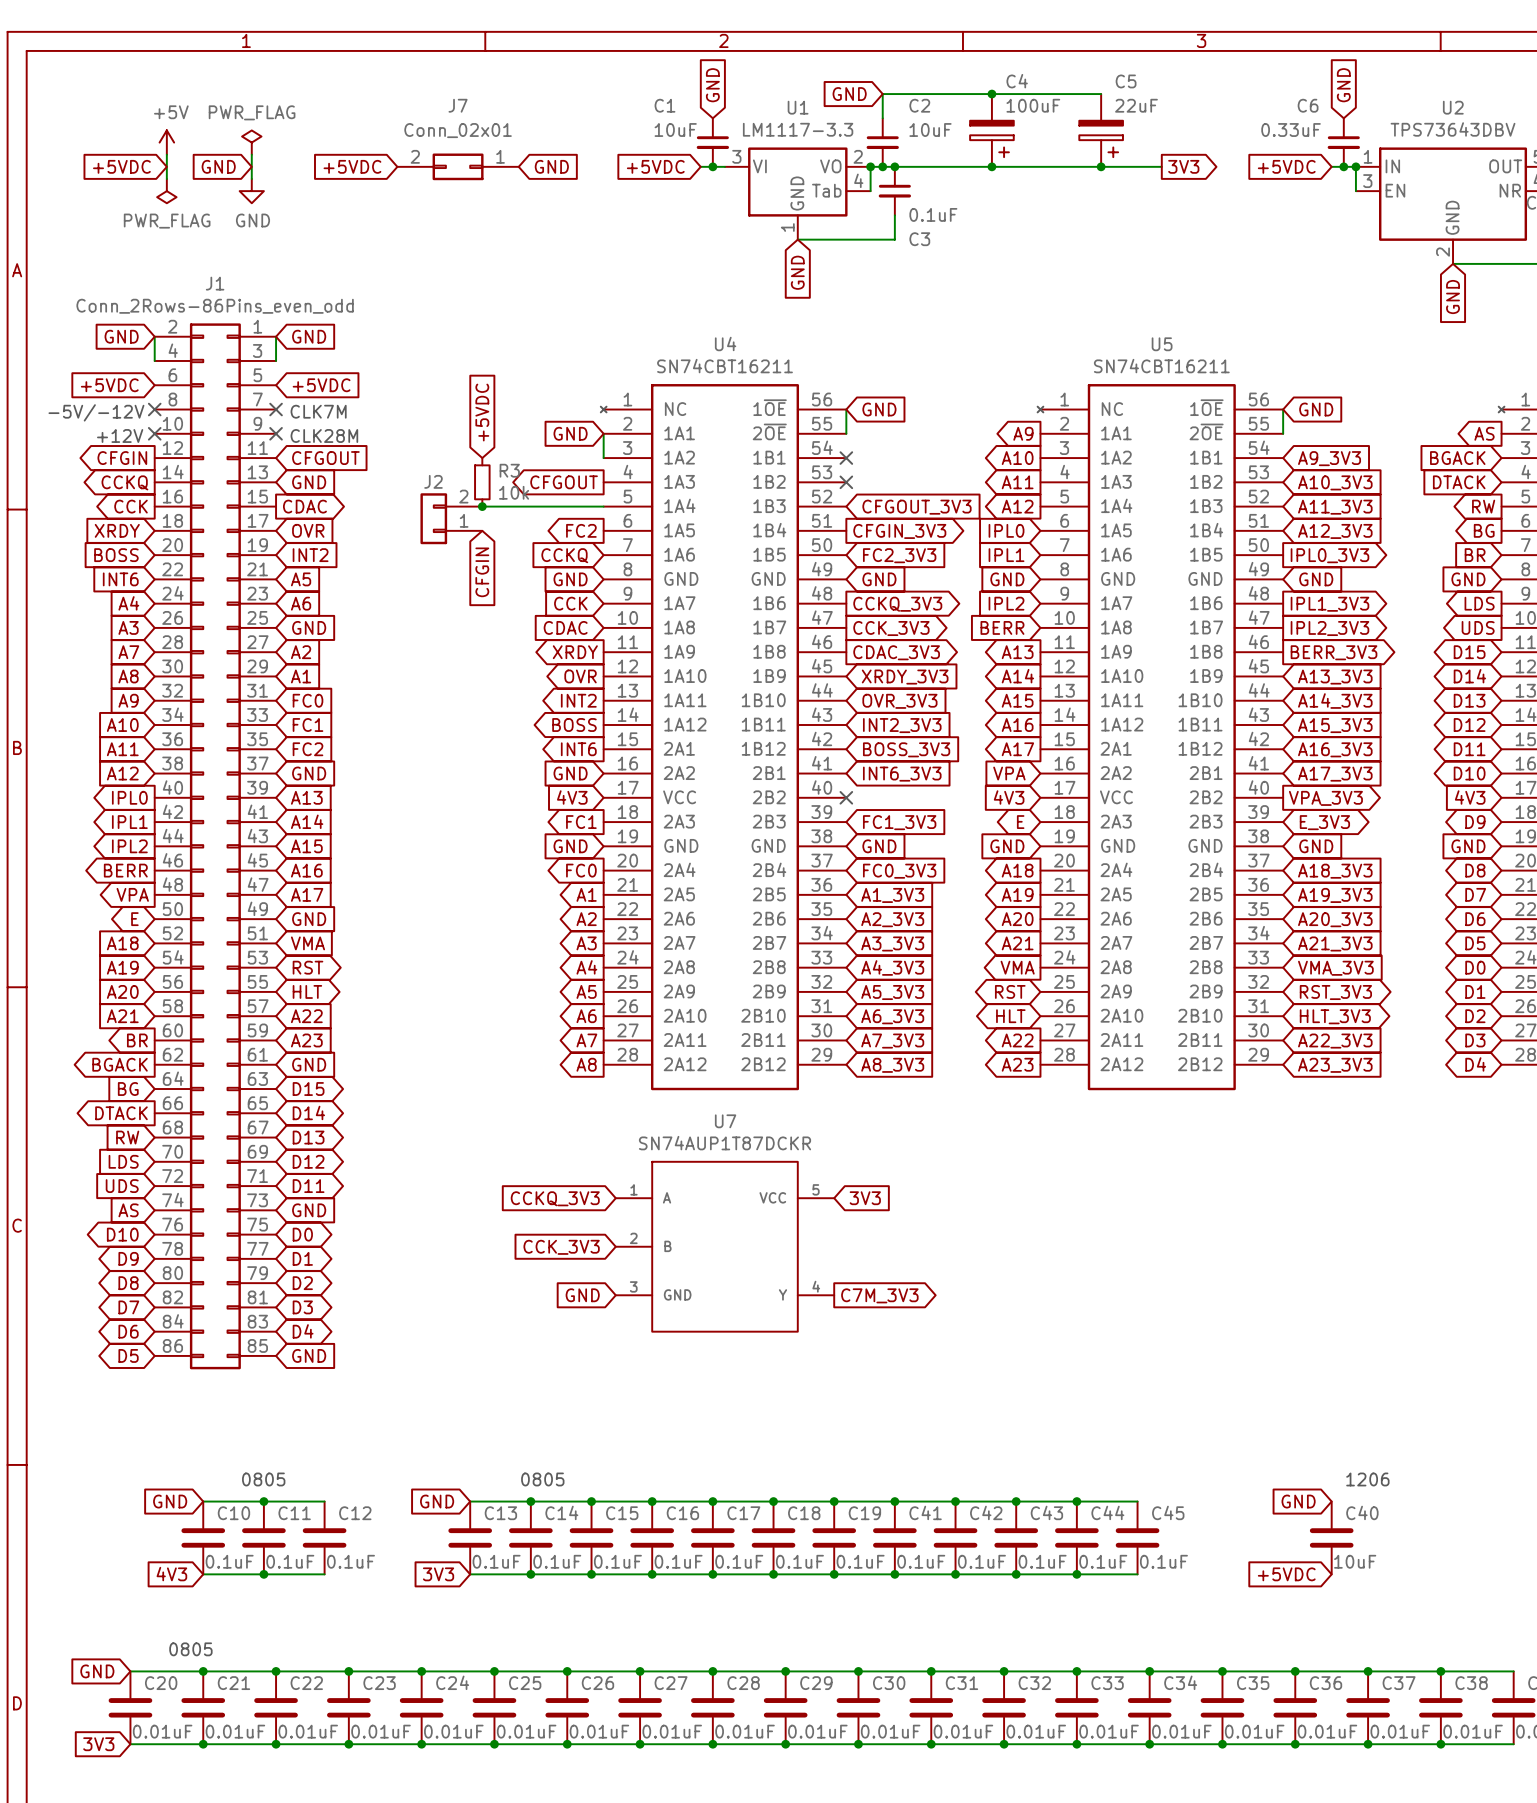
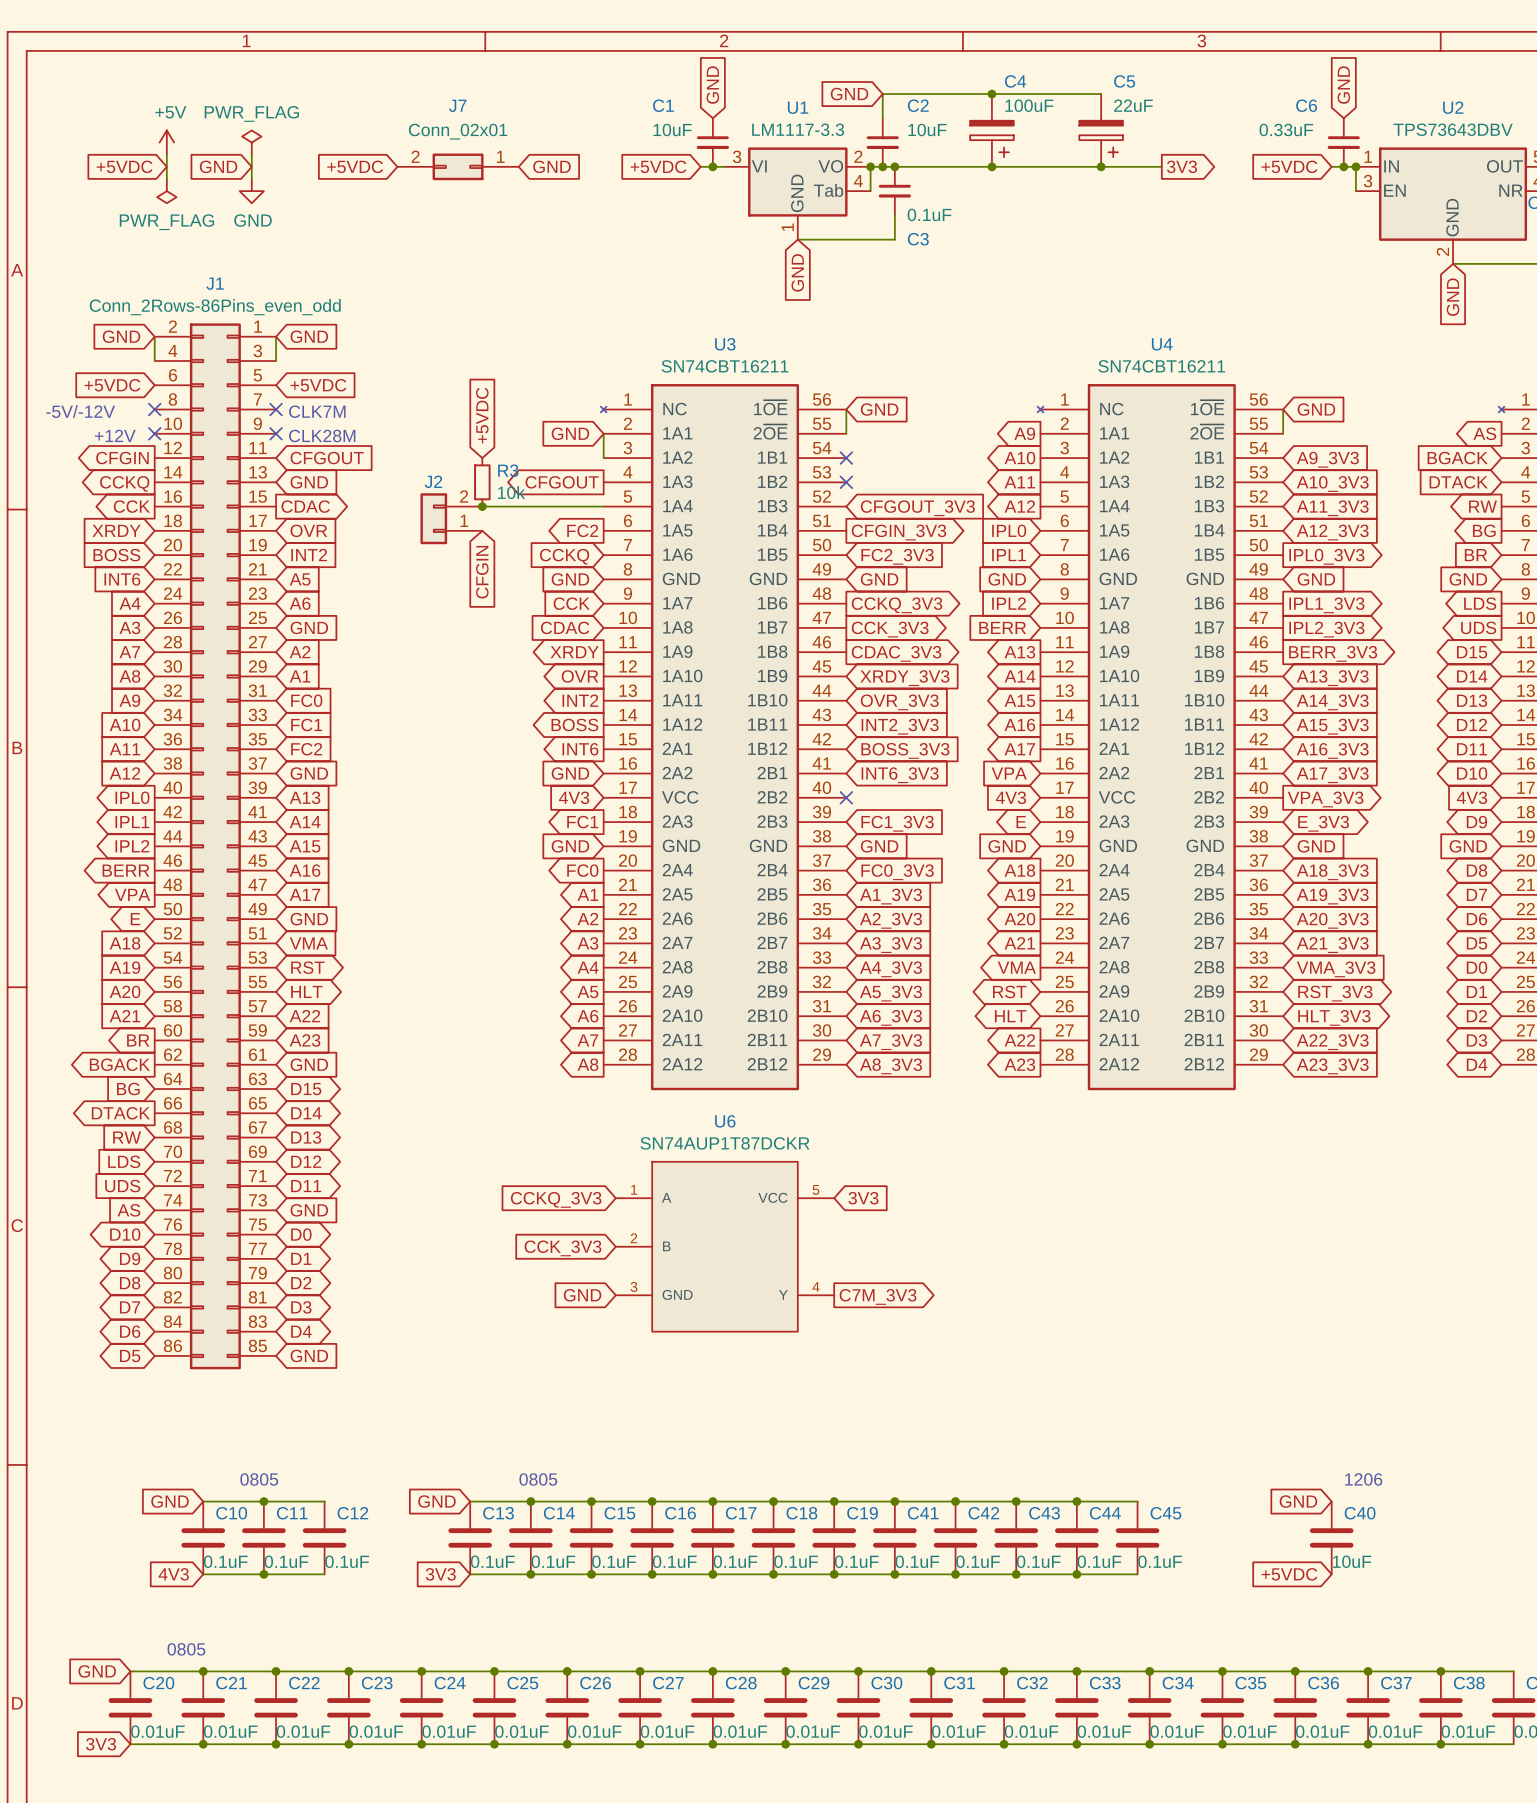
U4 name: U4 (725, 343) -> U3 (725, 344)
U5 name: U5 (1162, 344) -> U4 (1162, 344)
U7 name: U7 (725, 1121) -> U6 (725, 1121)

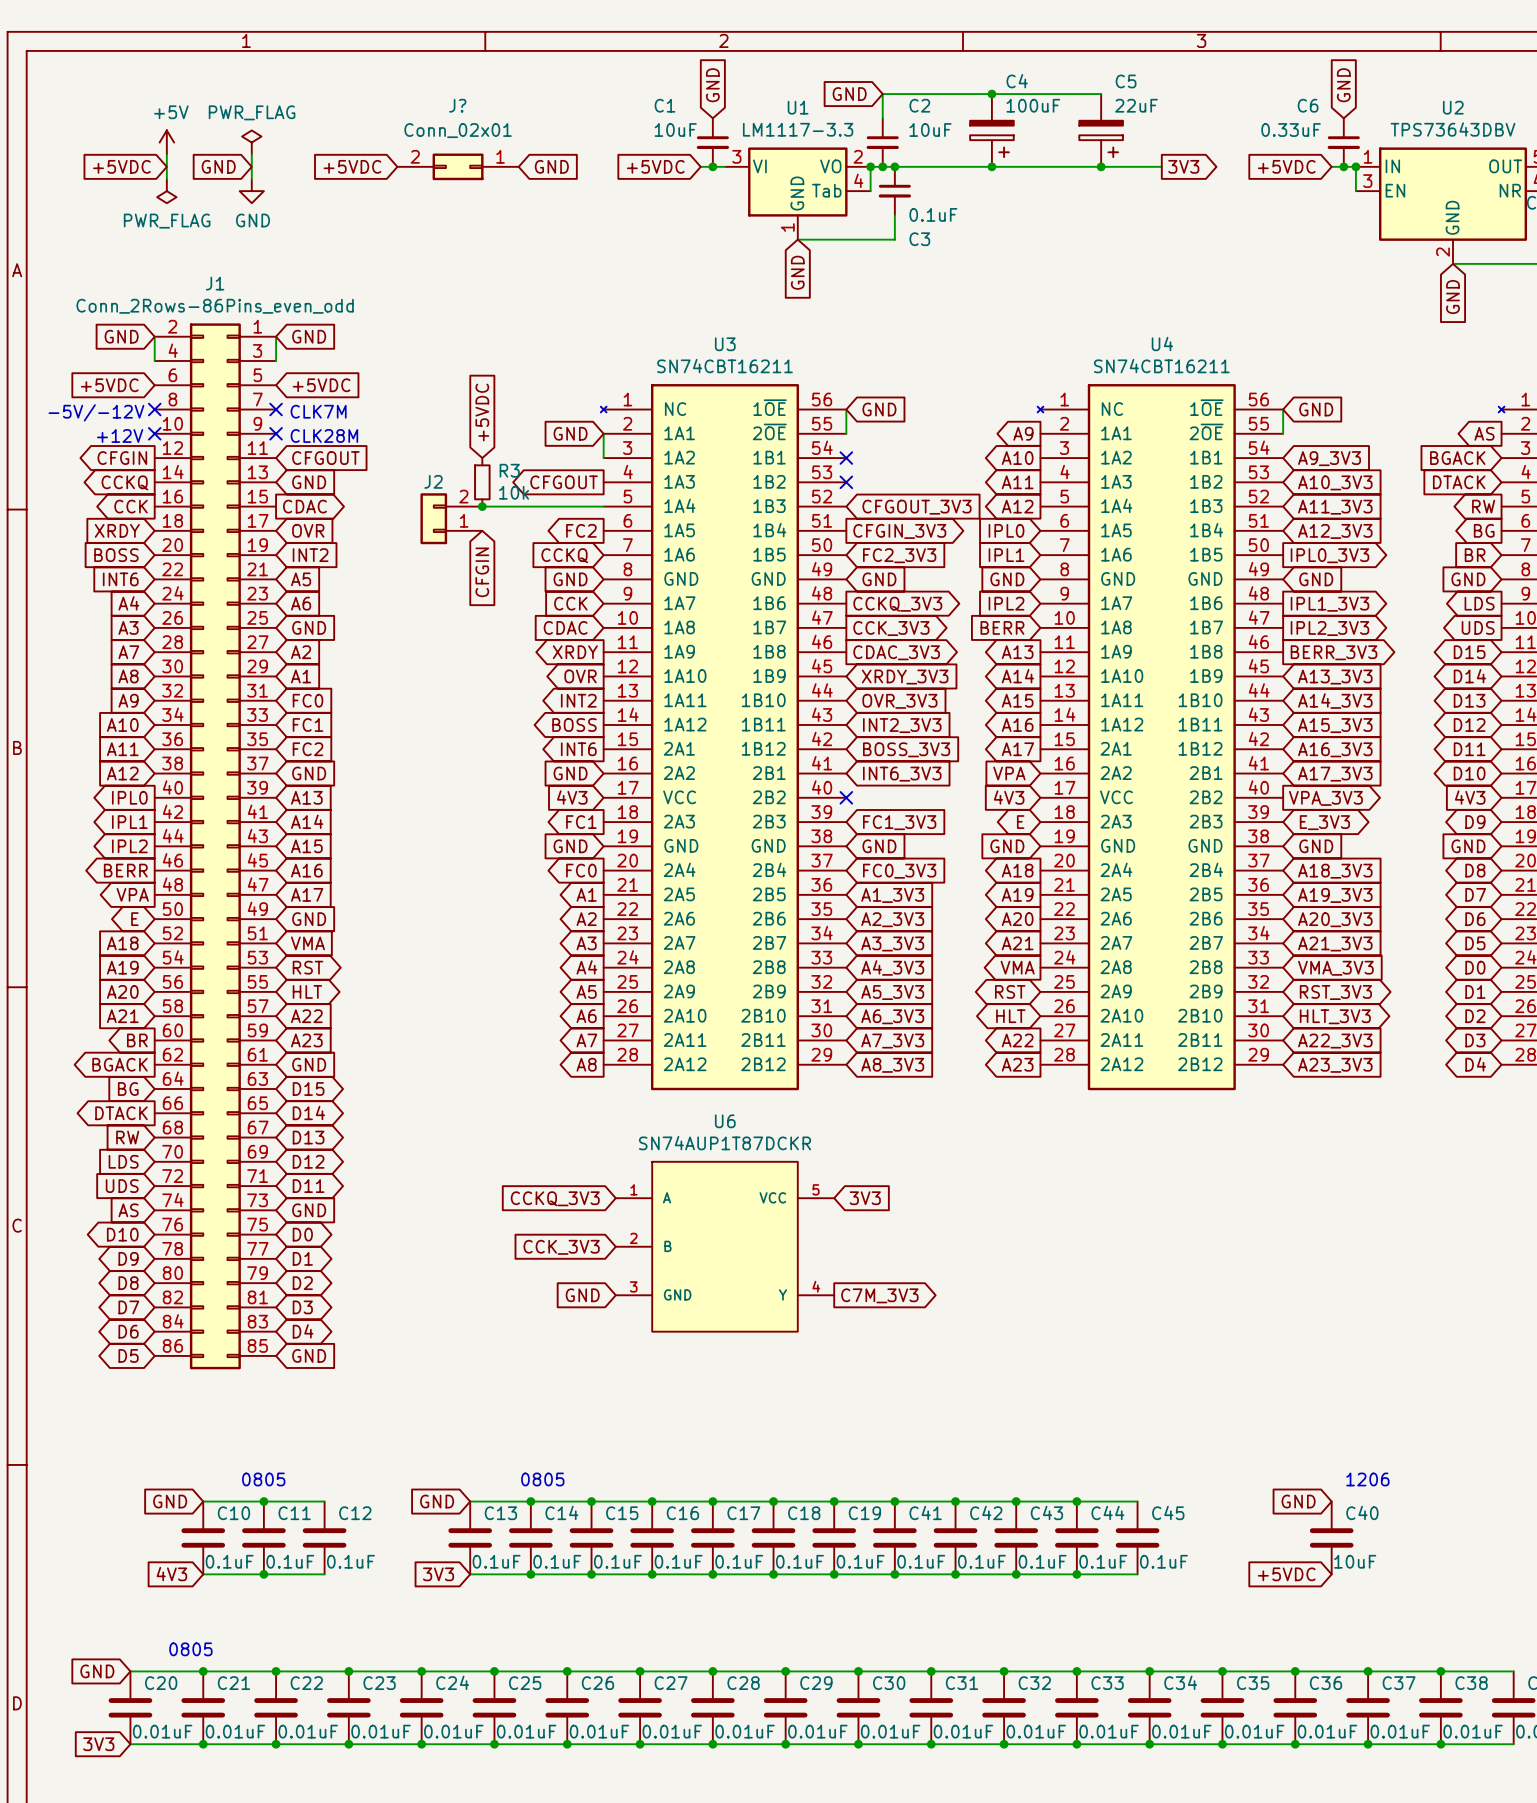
J7 name: J7 (457, 105) -> J? (457, 105)

